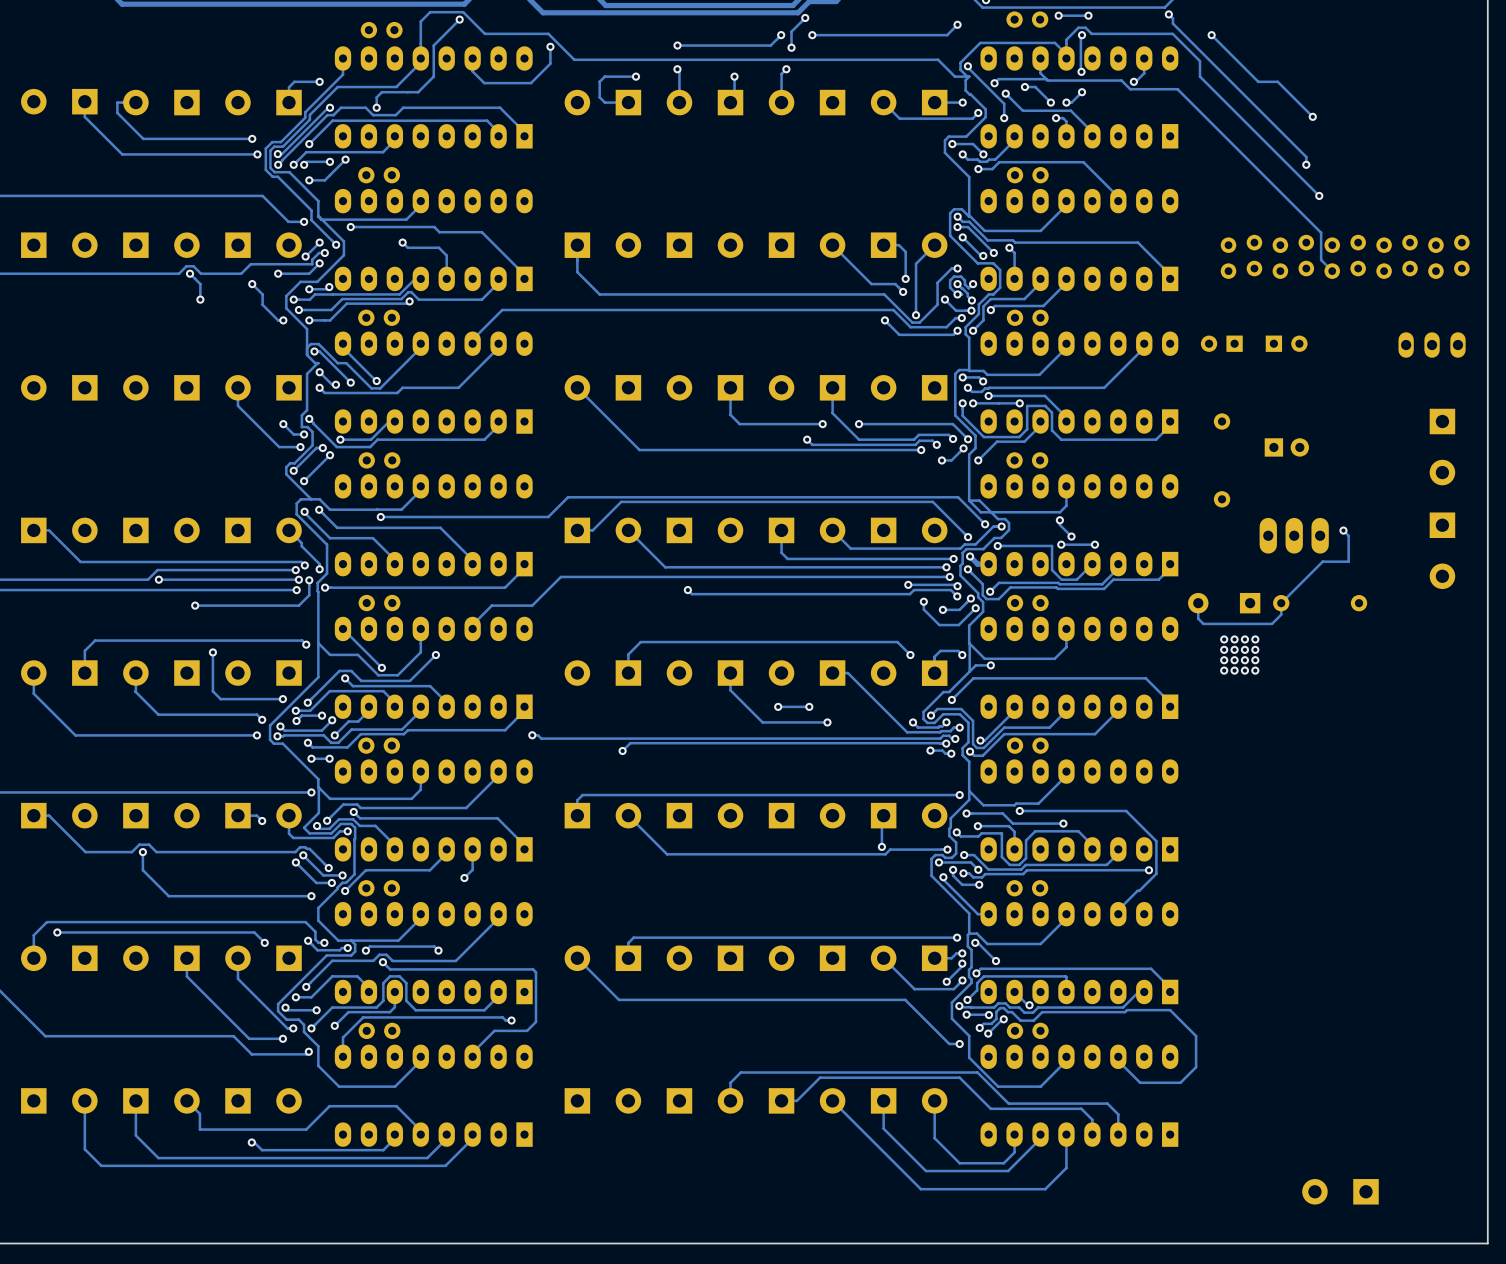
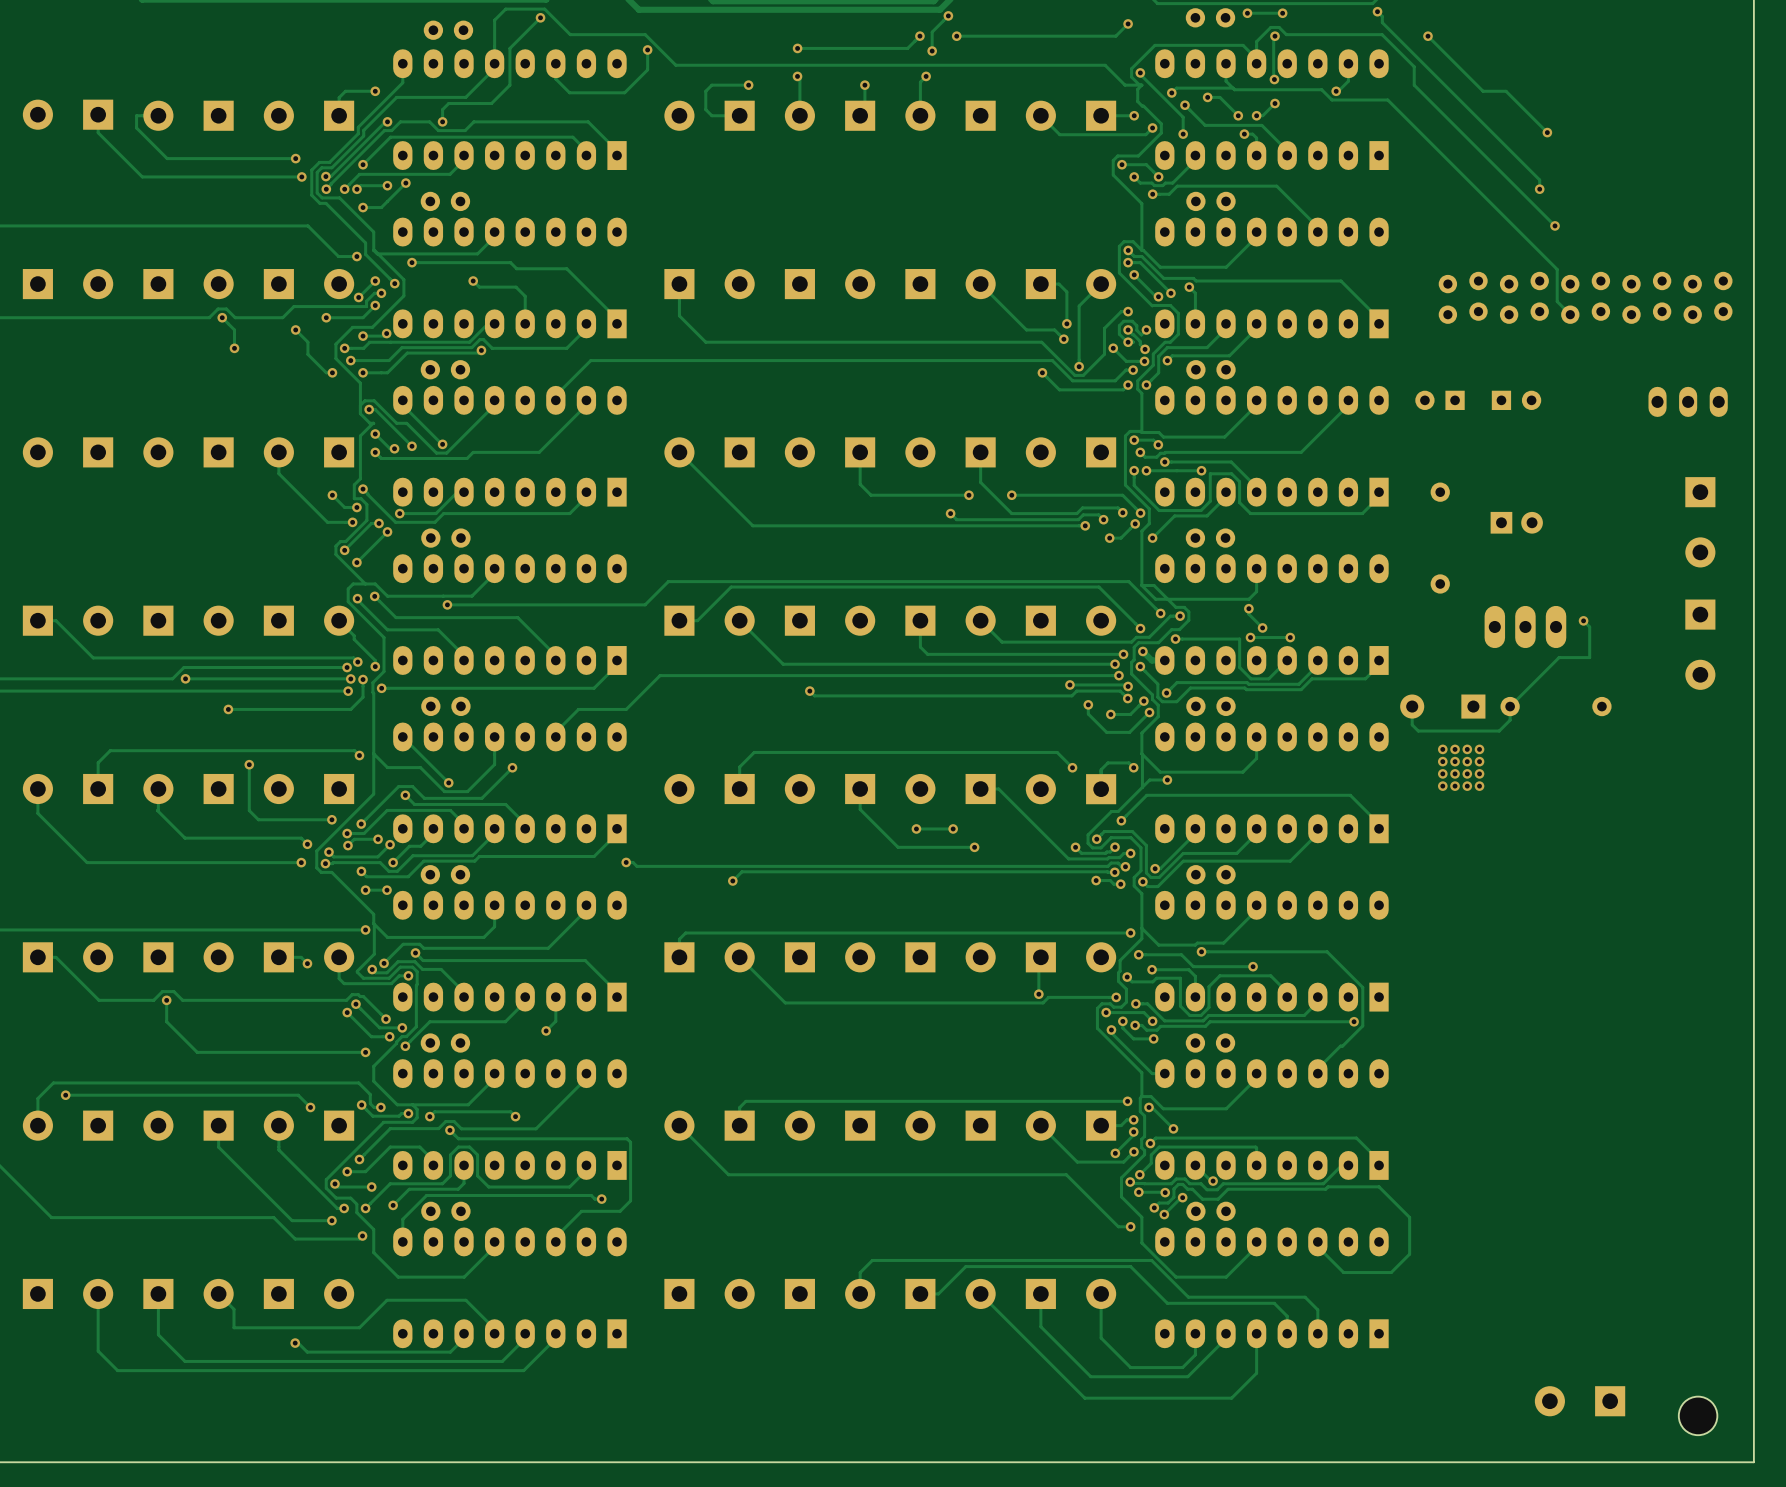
part: none -> (1698, 1415)

